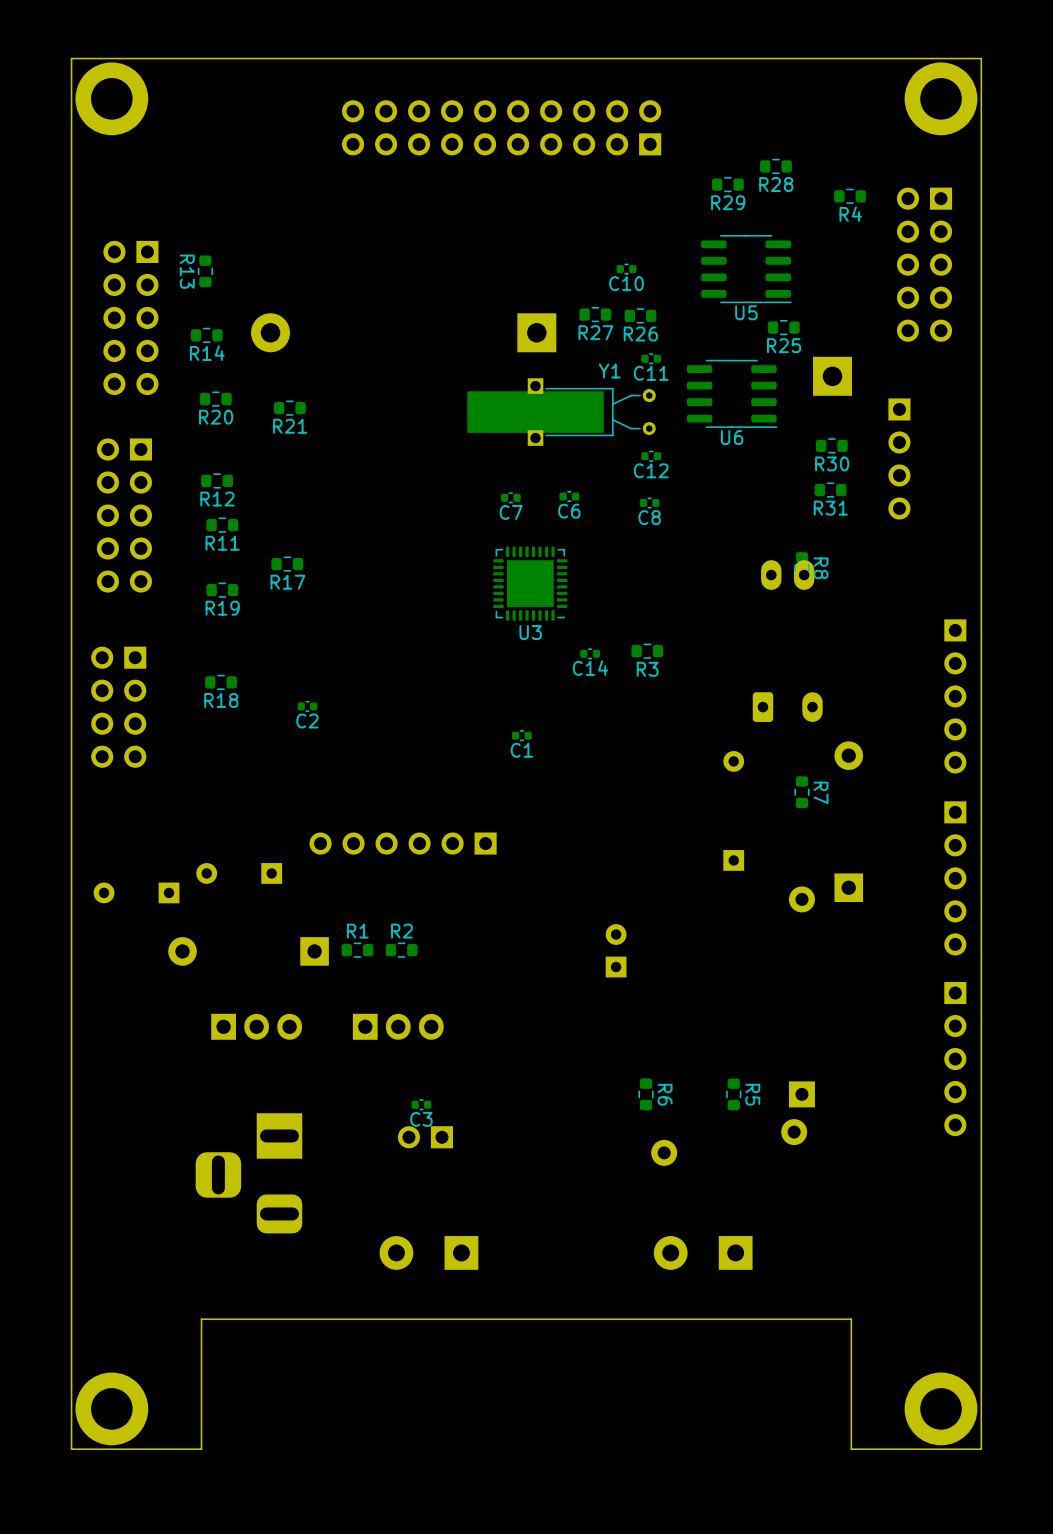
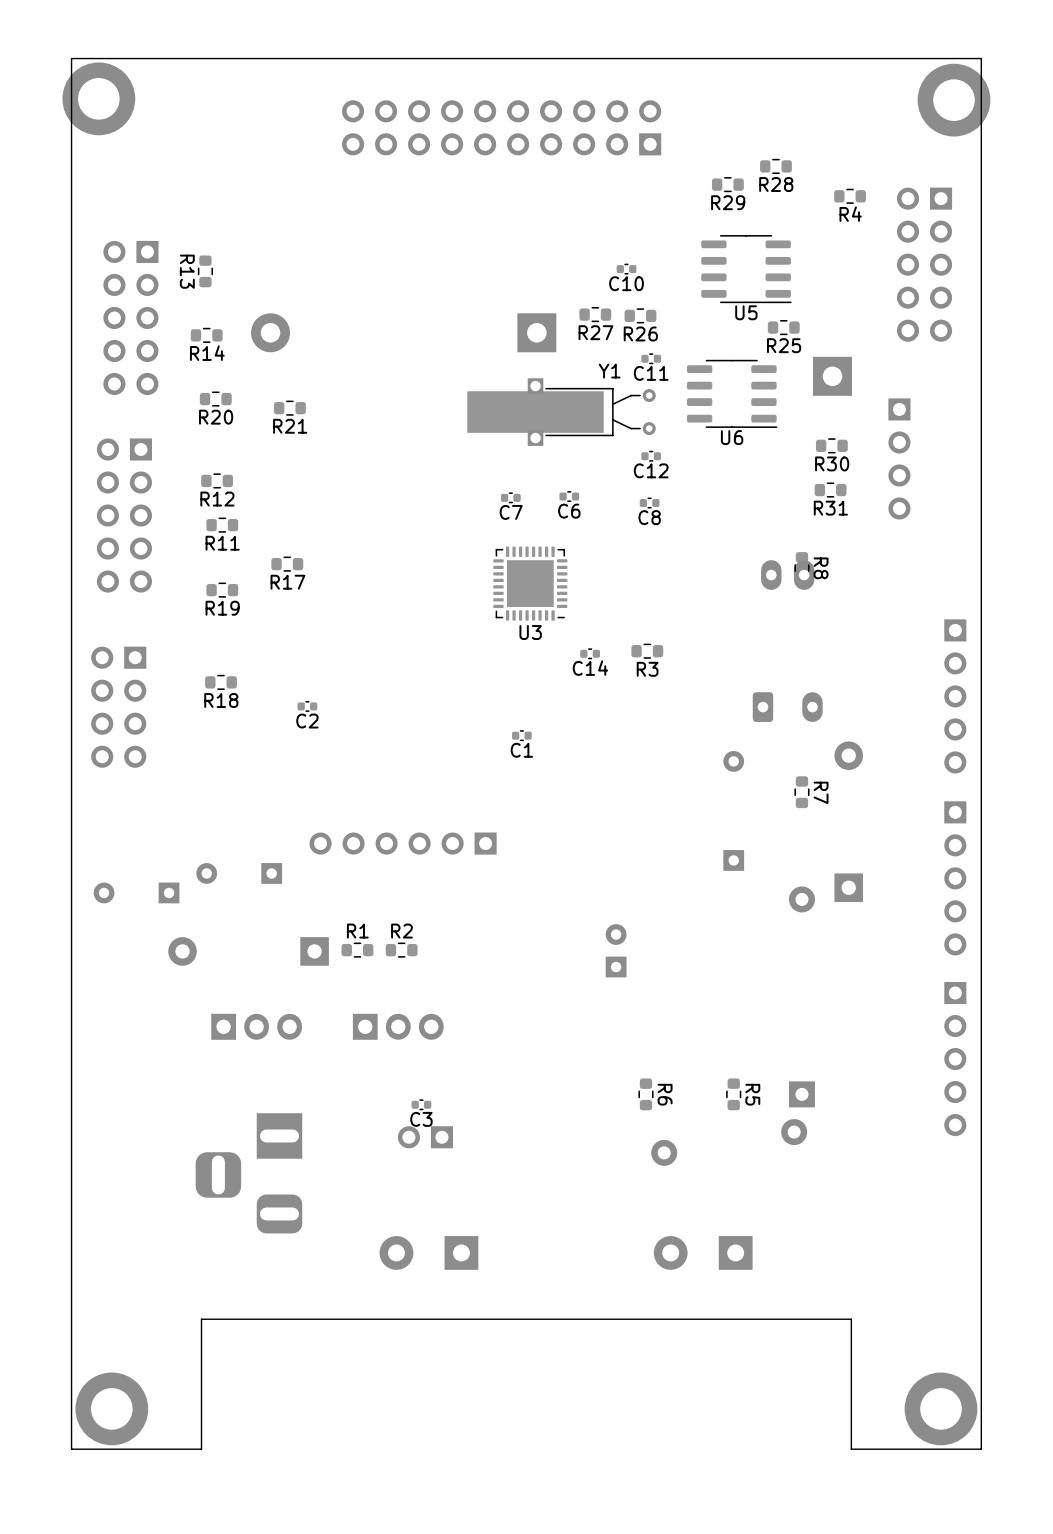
part position: (111, 98) -> (98, 98)
part position: (941, 98) -> (954, 100)

